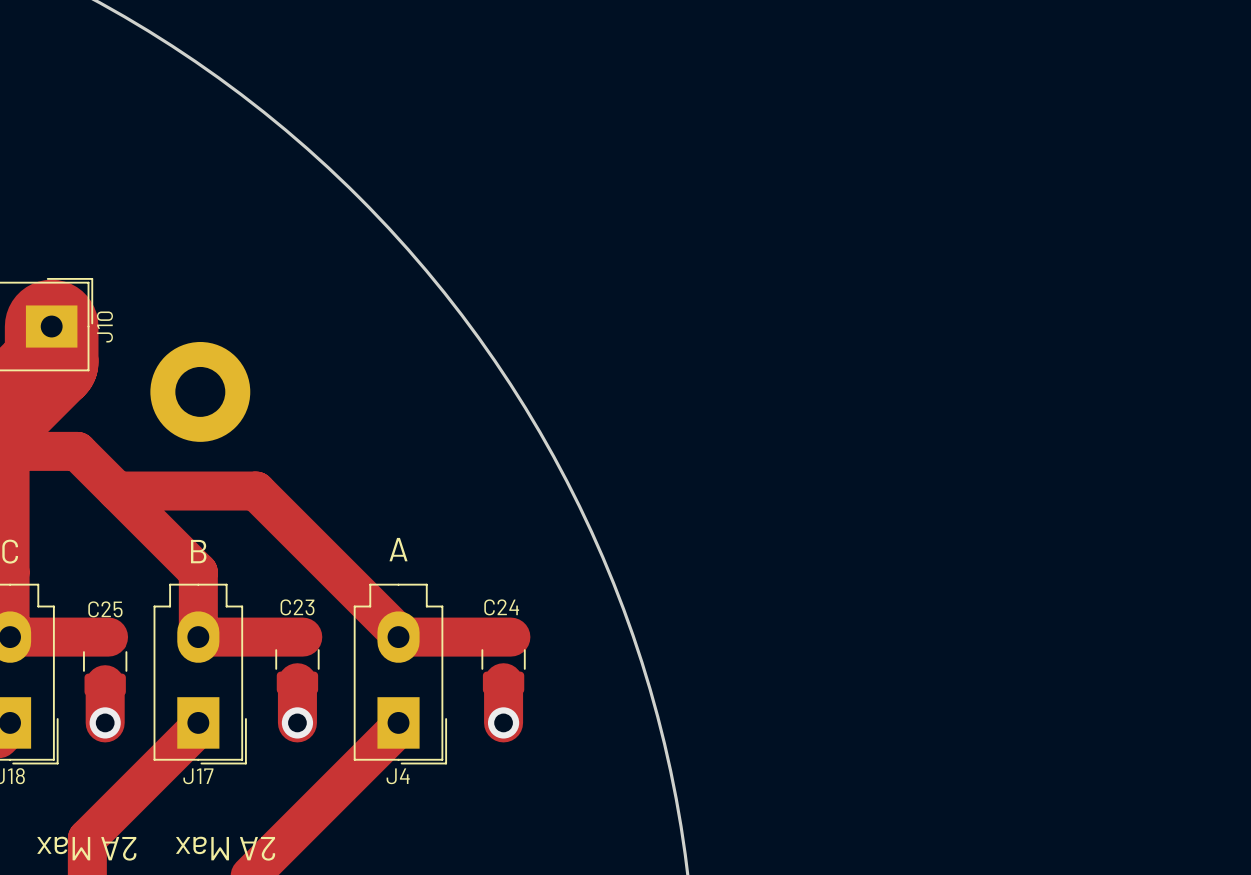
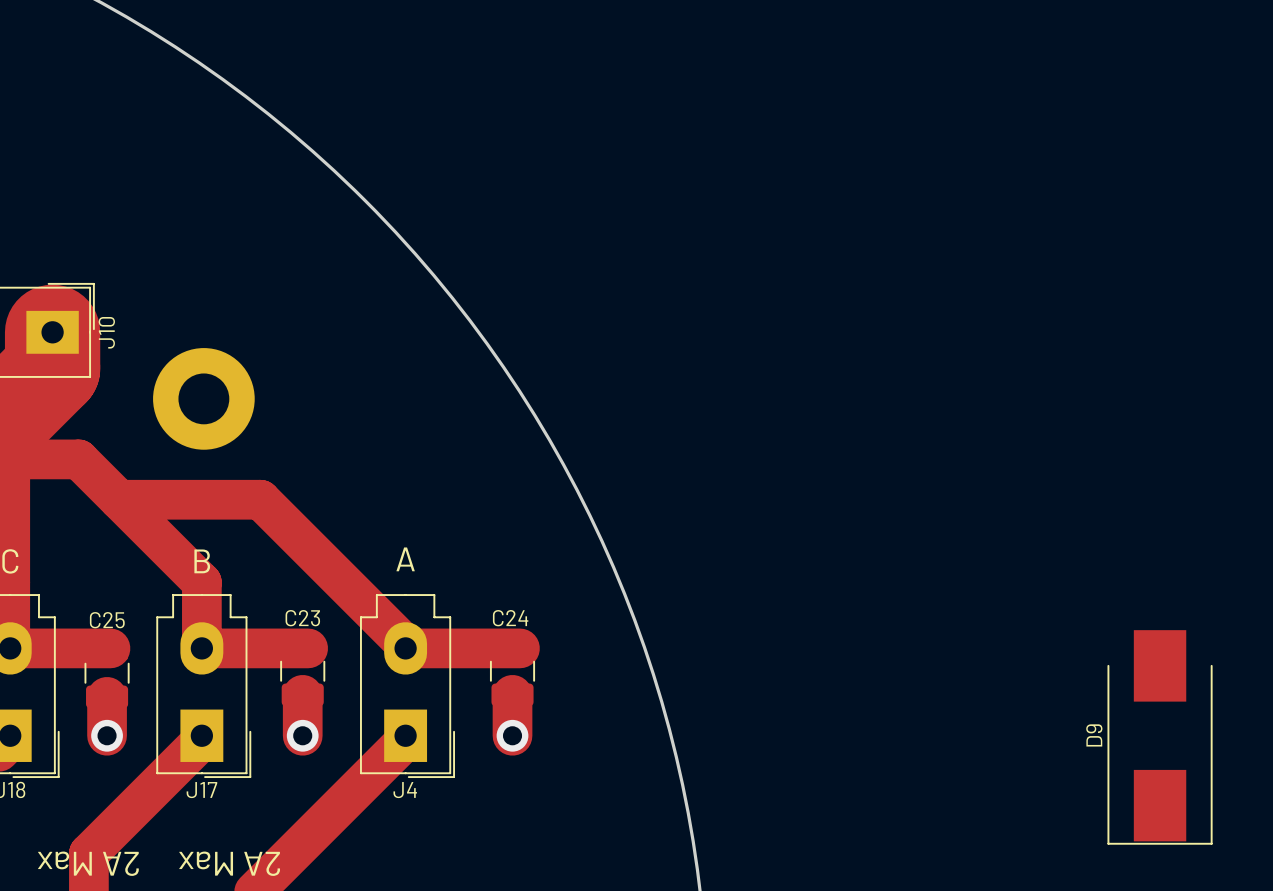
D9: none -> (1160, 737)

